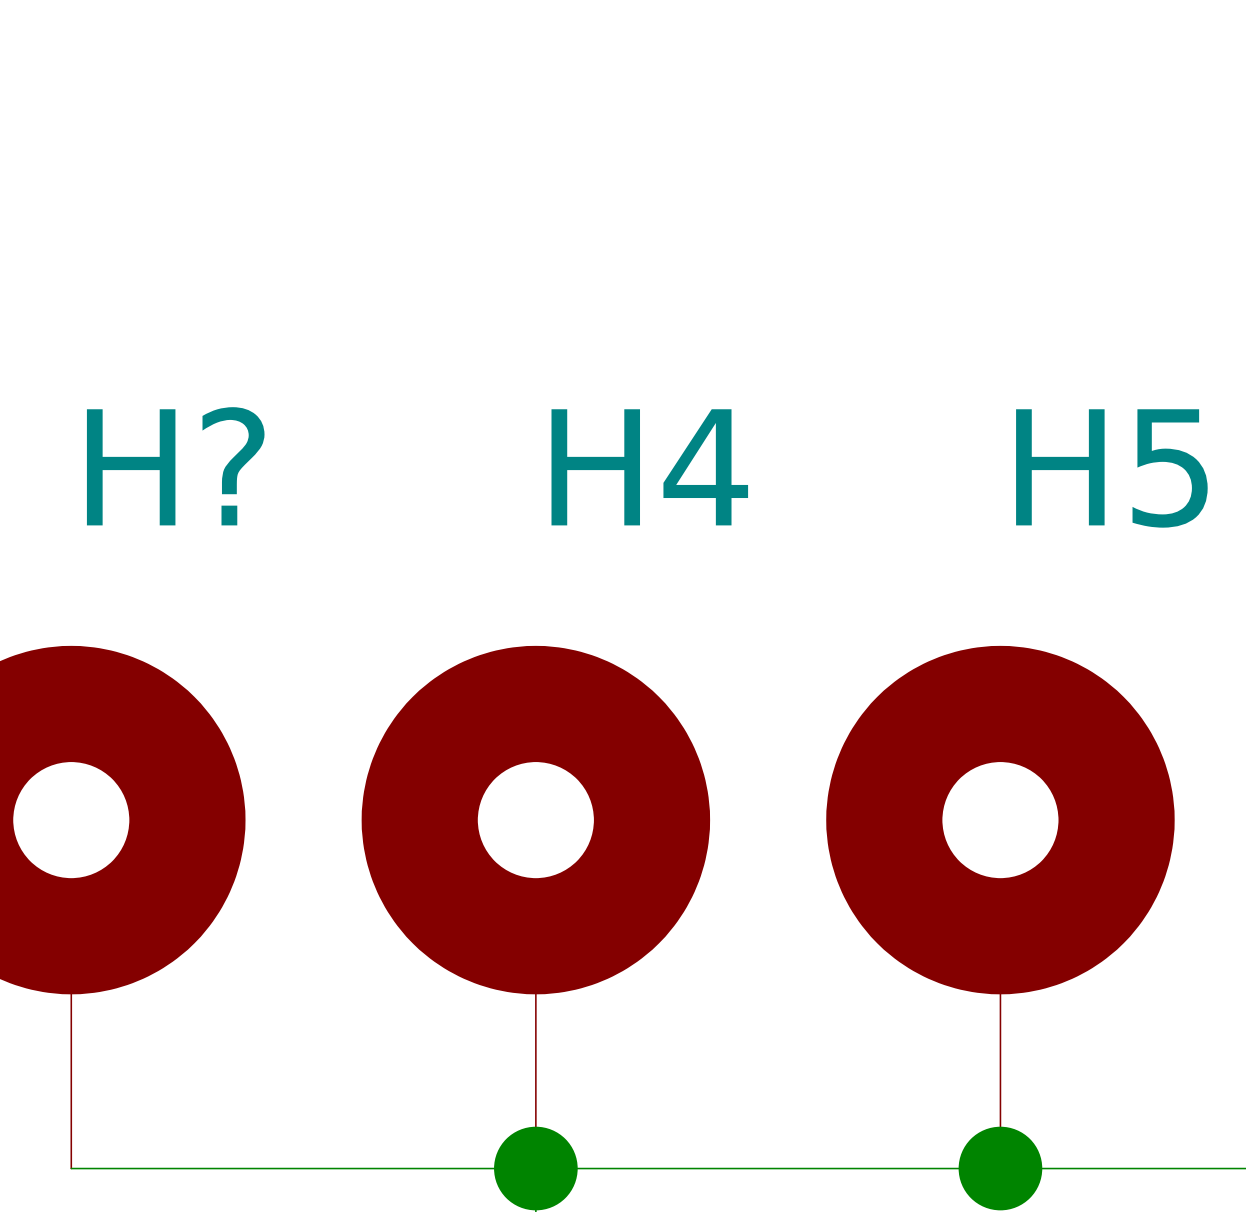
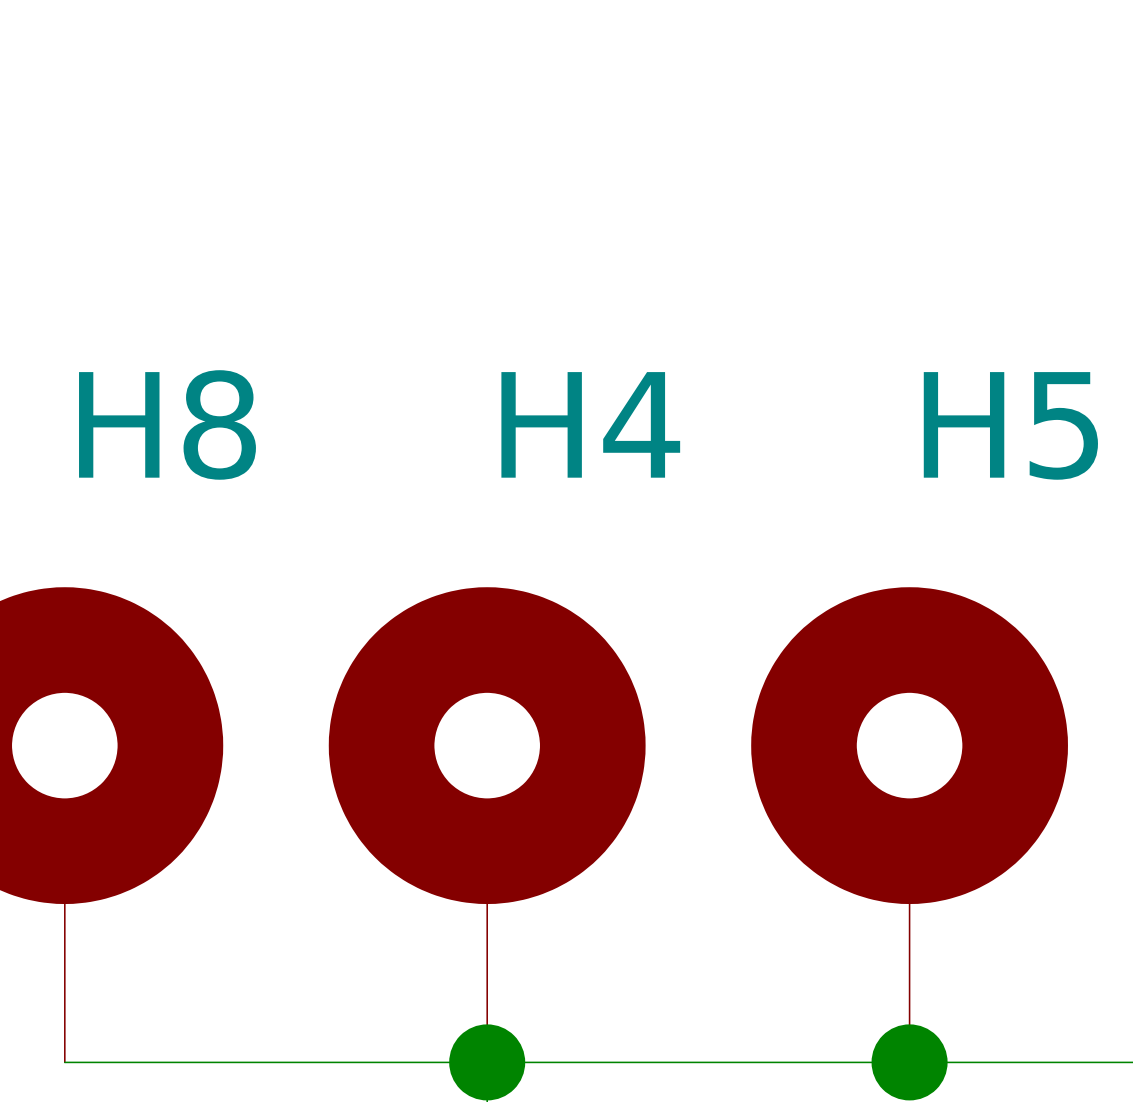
H? name: H? (175, 466) -> H8 (167, 424)

